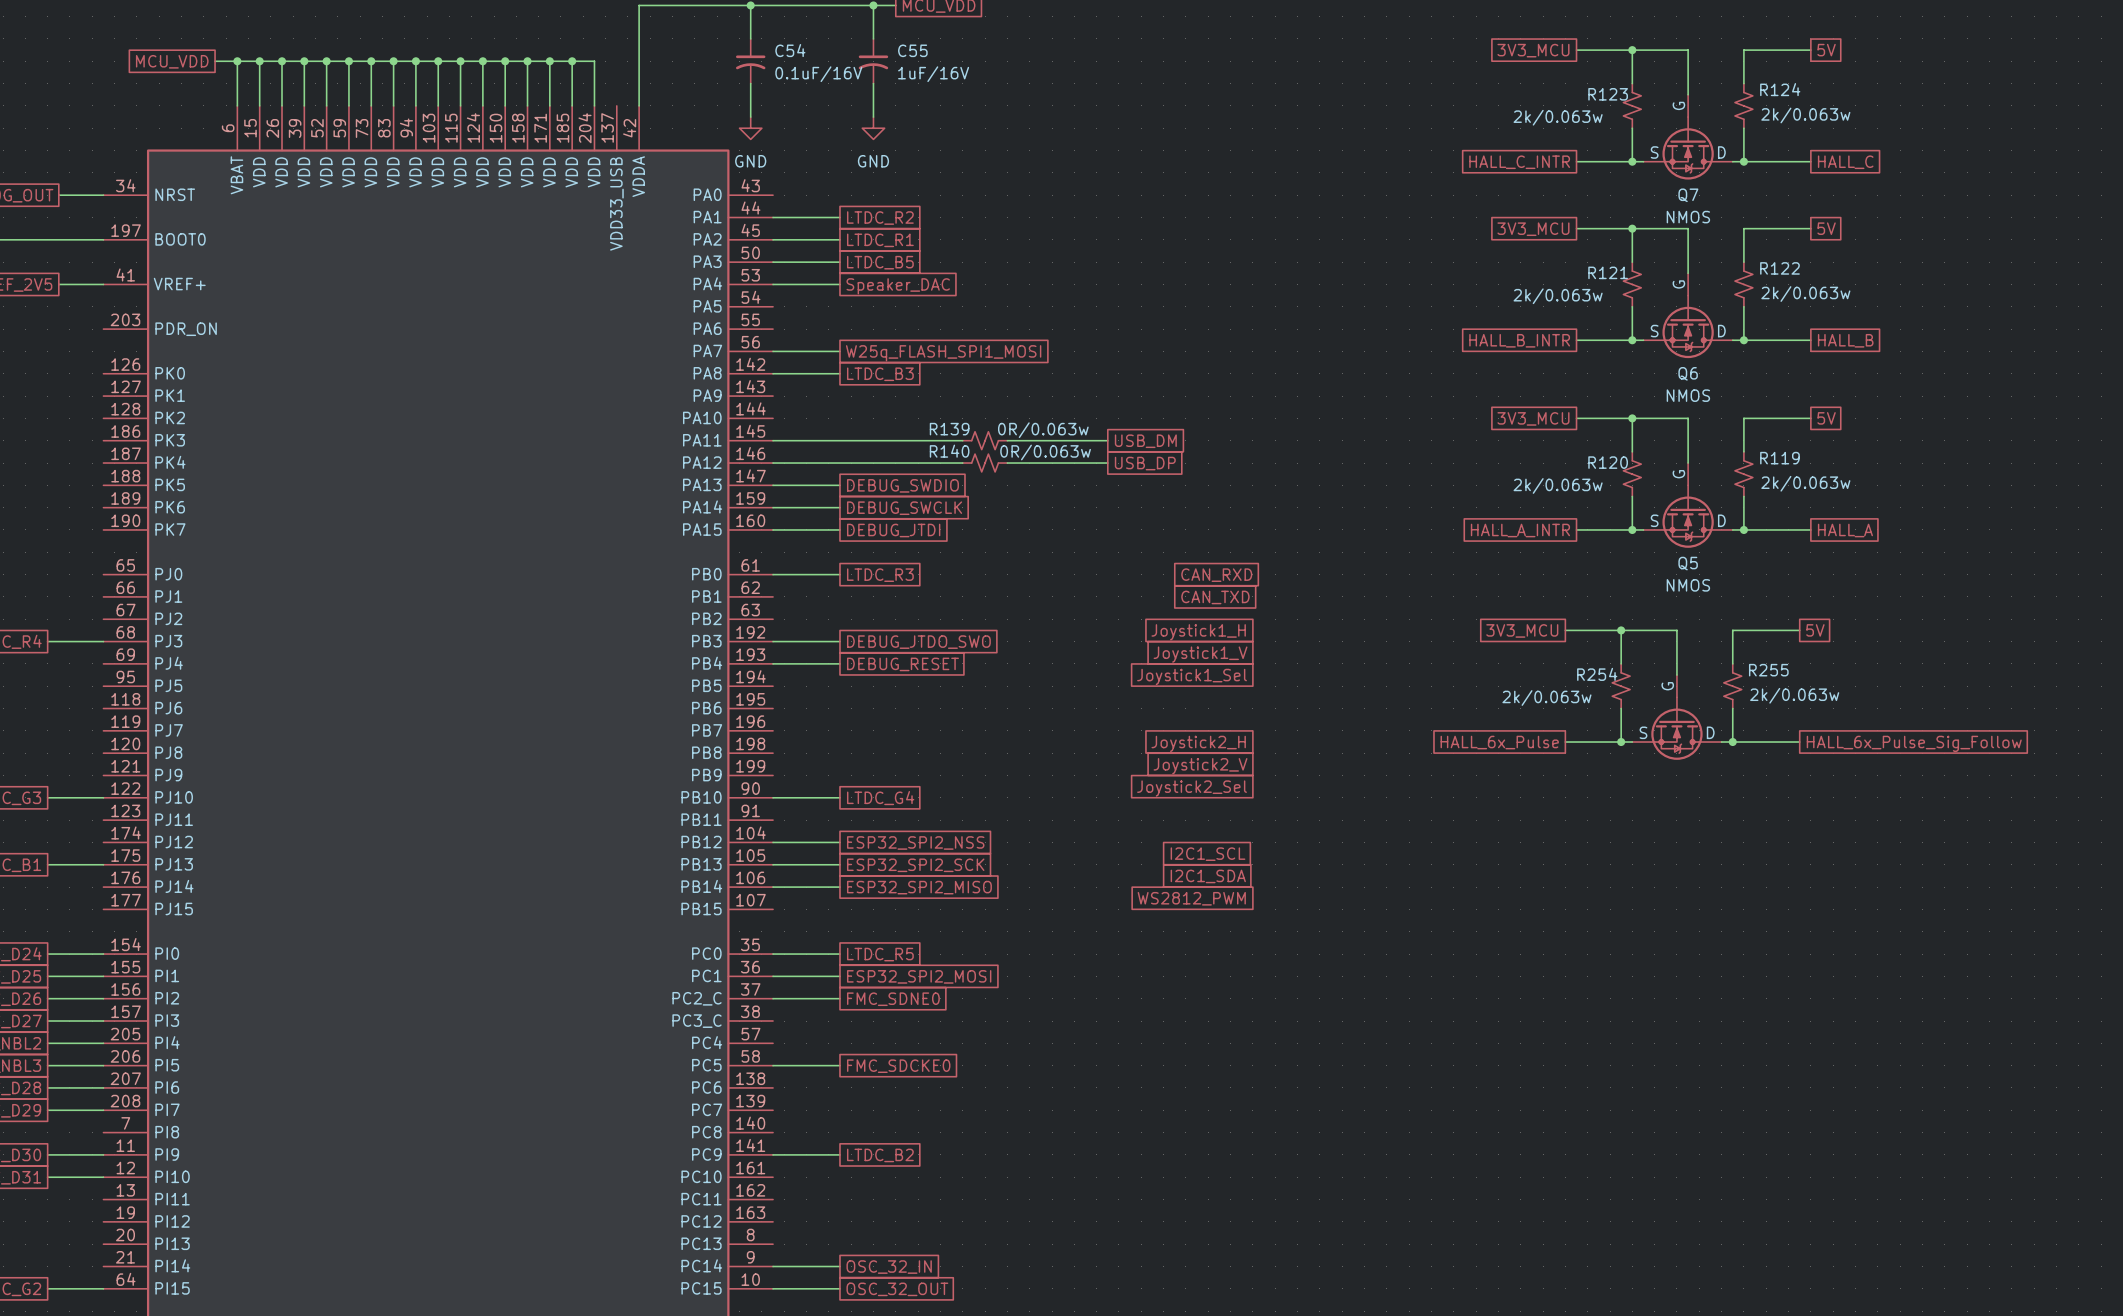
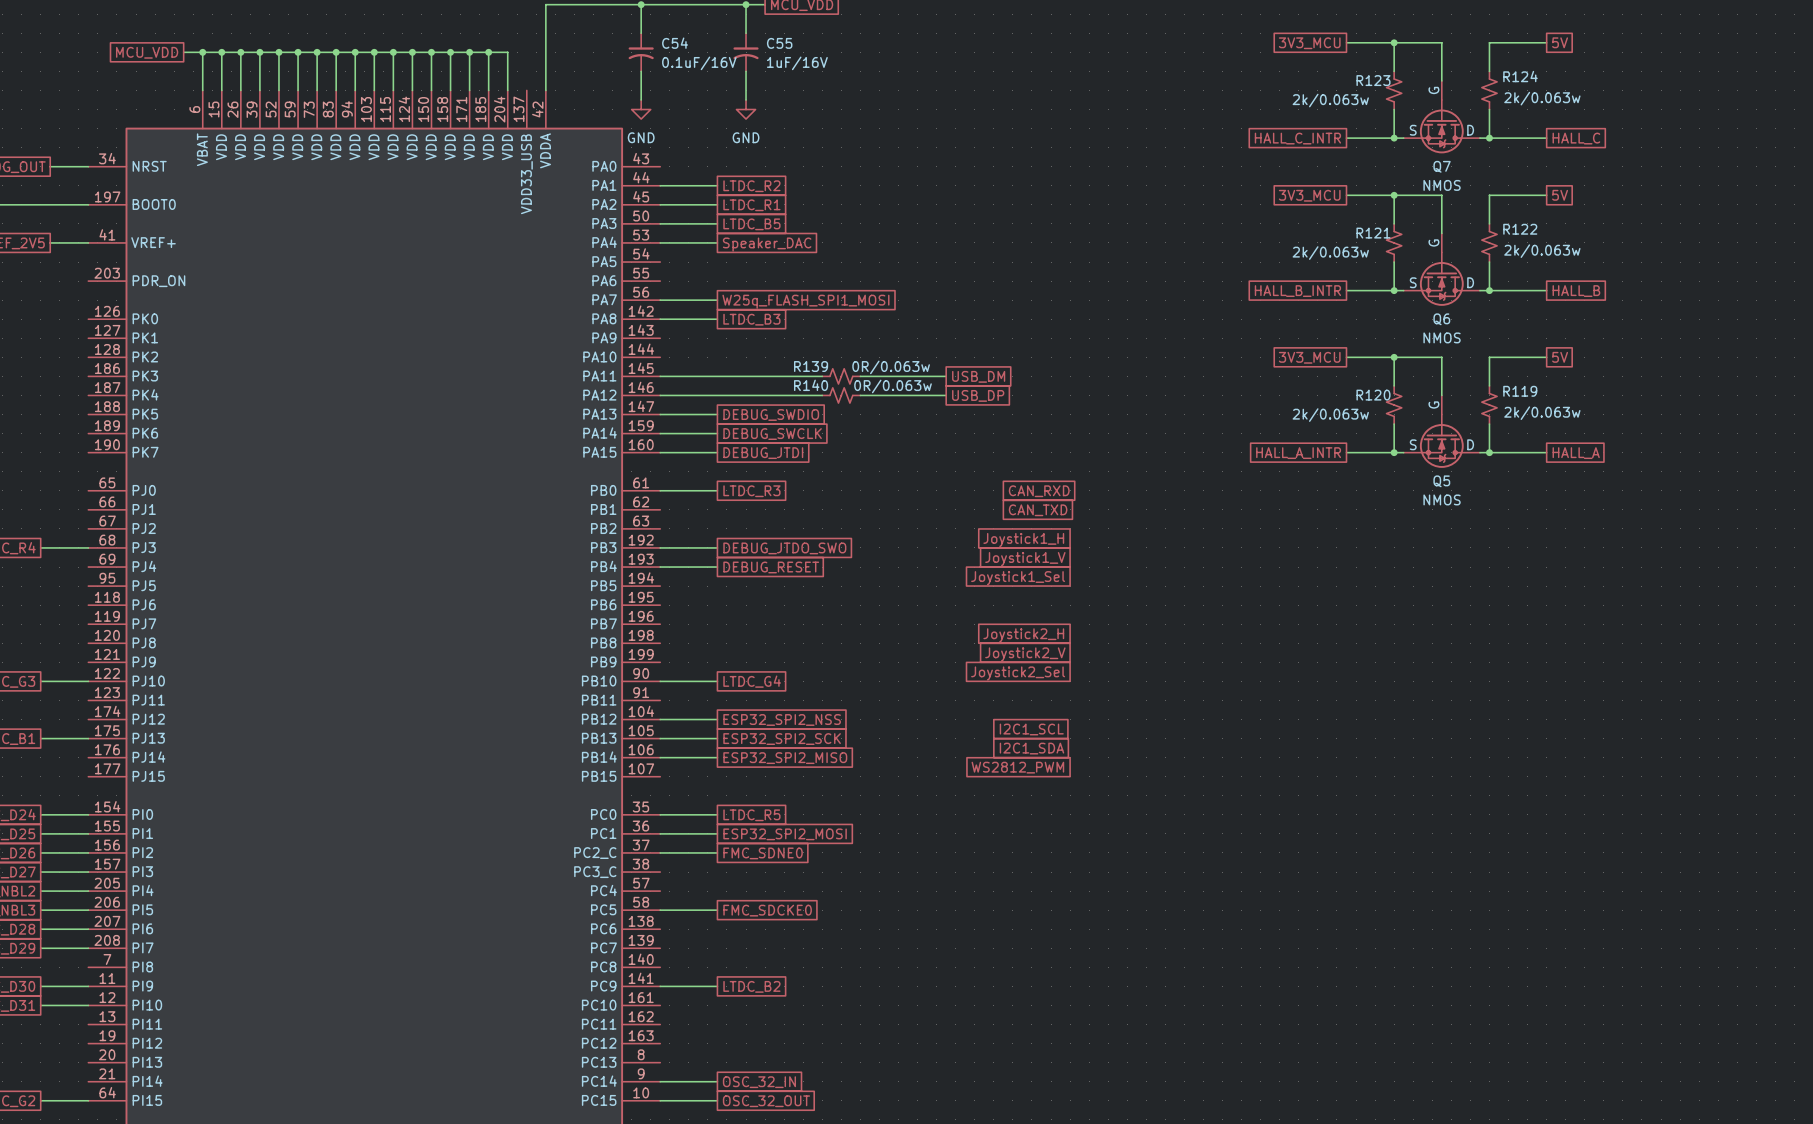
global label: 3V3_MCU (1522, 630) -> none
wire: (1565, 630) (1676, 630) (1676, 675) -> none
wire: (1621, 630) (1621, 663) -> none
junction: (1621, 630) -> none
wire: (1799, 630) (1732, 630) (1732, 663) -> none
global label: 5V (1815, 630) -> none
R254: 2k/0.063w (1621, 686) -> none
R255: 2k/0.063w (1732, 686) -> none
wire: (1621, 708) (1621, 742) -> none
wire: (1732, 708) (1732, 742) -> none
part: (1676, 717) -> none
global label: HALL_6x_Pulse (1499, 742) -> none
wire: (1565, 742) (1632, 742) -> none
junction: (1621, 742) -> none
wire: (1721, 742) (1799, 742) -> none
junction: (1732, 742) -> none
global label: HALL_6x_Pulse_Sig_Follow (1914, 743) -> none

